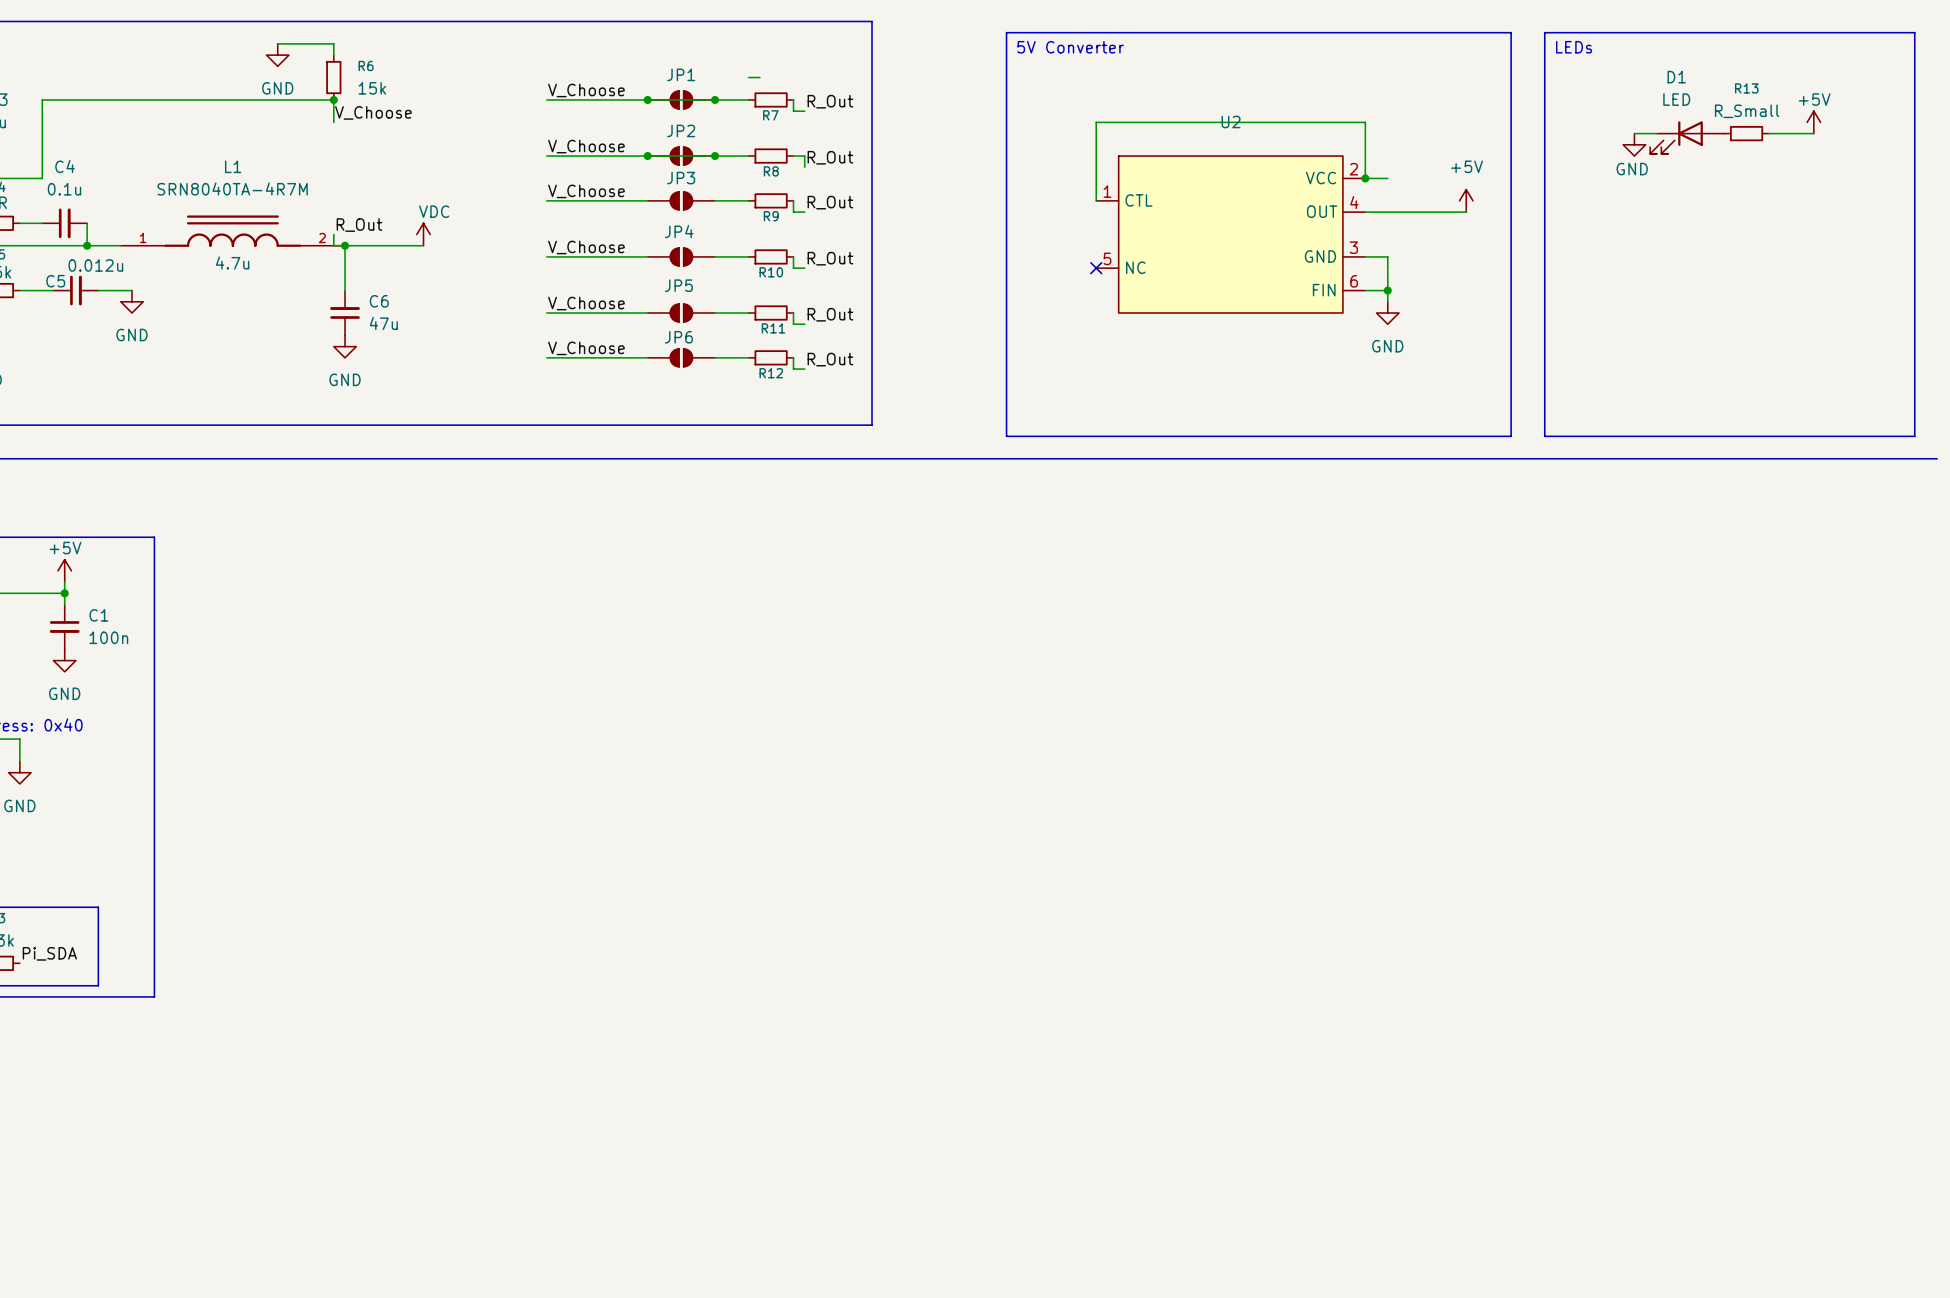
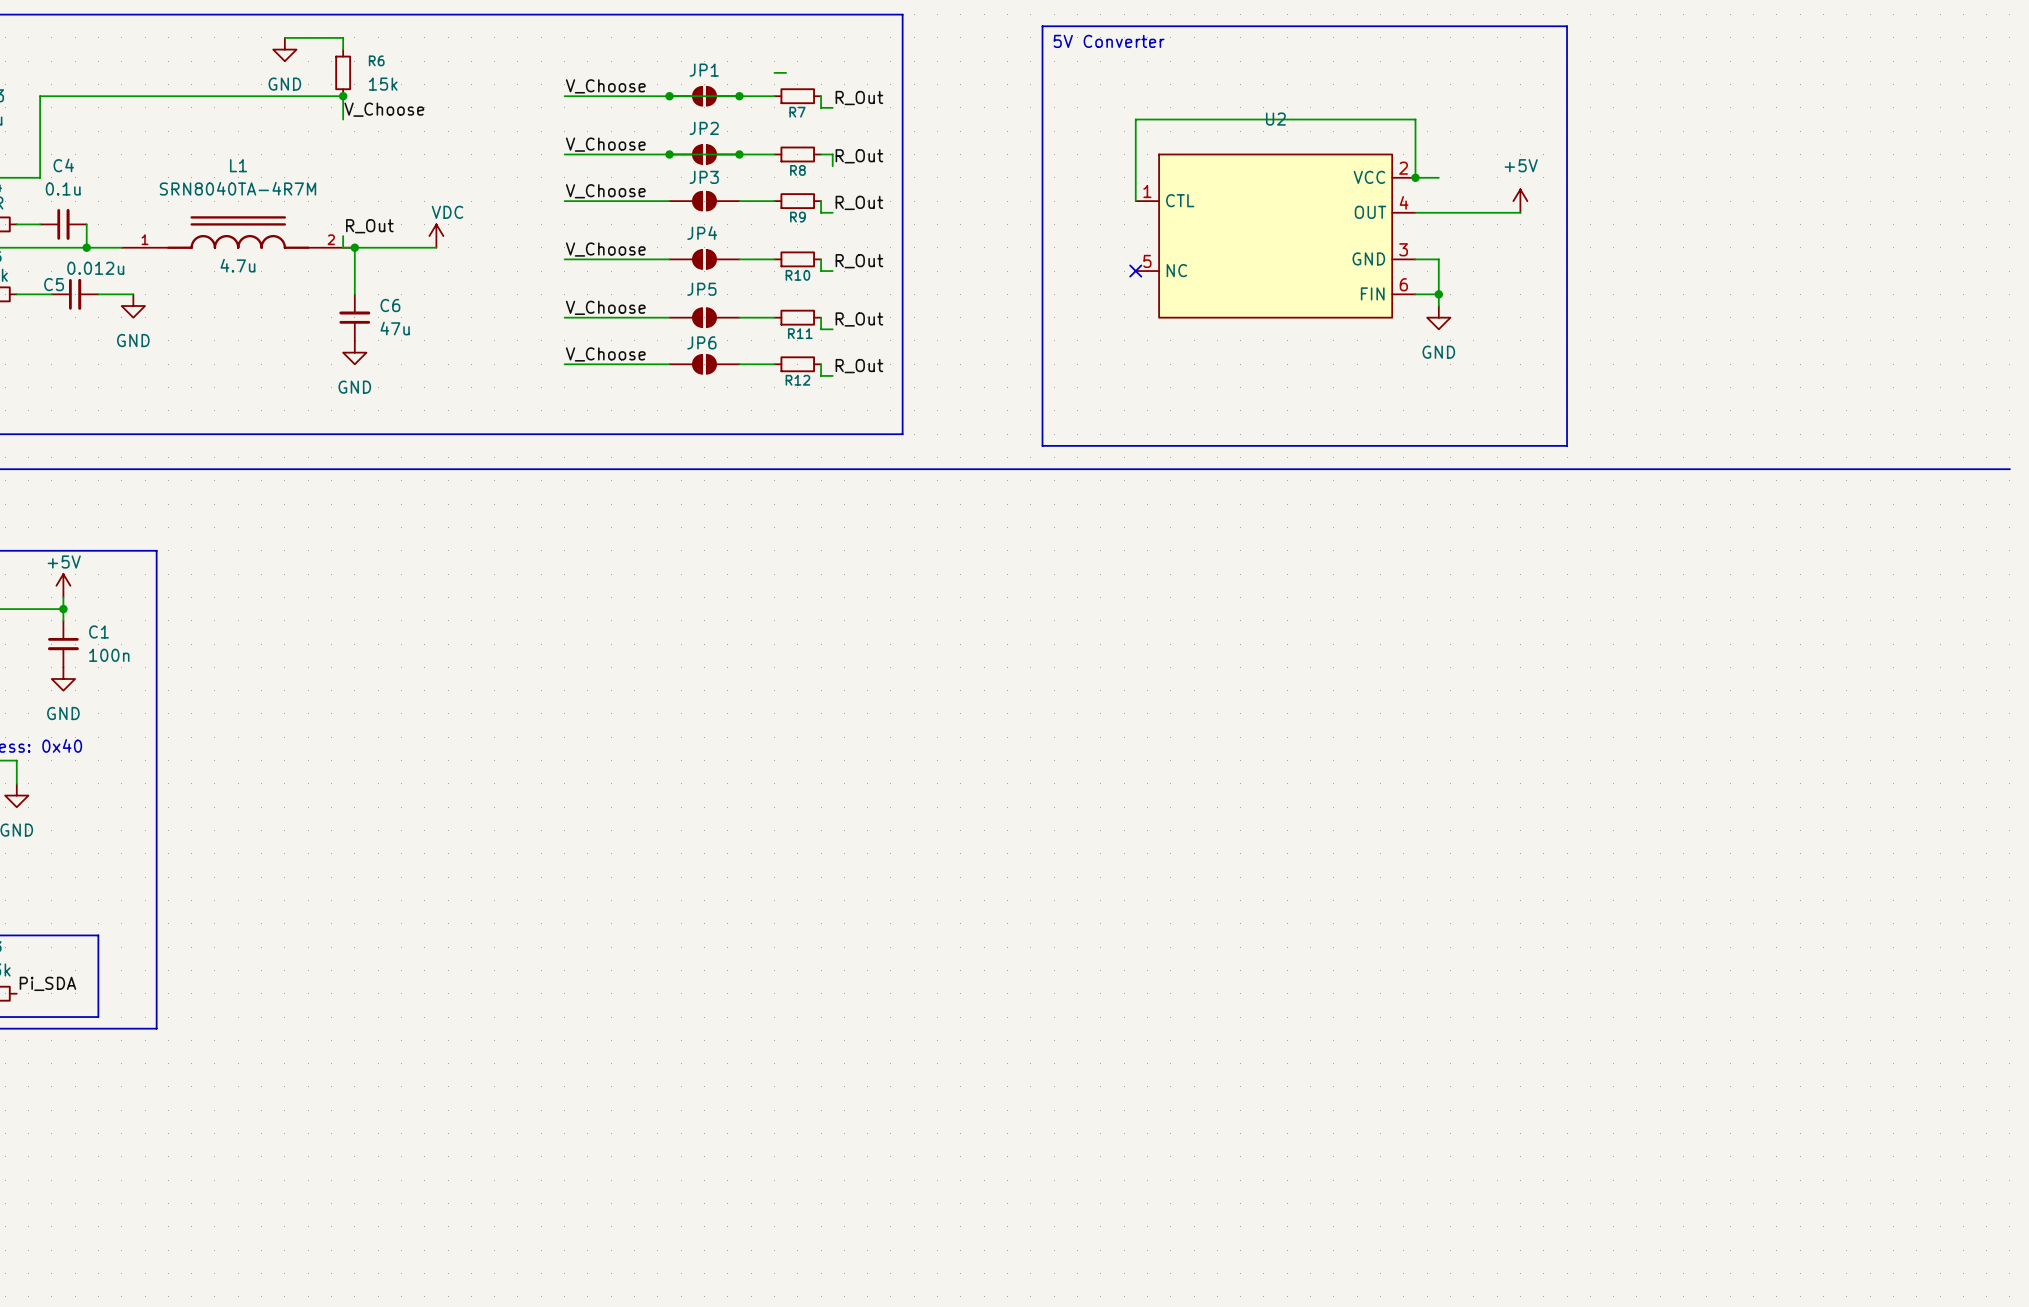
line: (1544, 32) (1914, 32) (1914, 436) (1544, 436) (1544, 32) -> none
text: LEDs (1574, 47) -> none
power symbol: +5V (1813, 122) -> none
wire: (1634, 133) (1656, 133) -> none
R13: R_Small (1746, 133) -> none
wire: (1768, 133) (1813, 133) -> none
D1: LED (1687, 137) -> none
power symbol: GND (1634, 144) -> none

